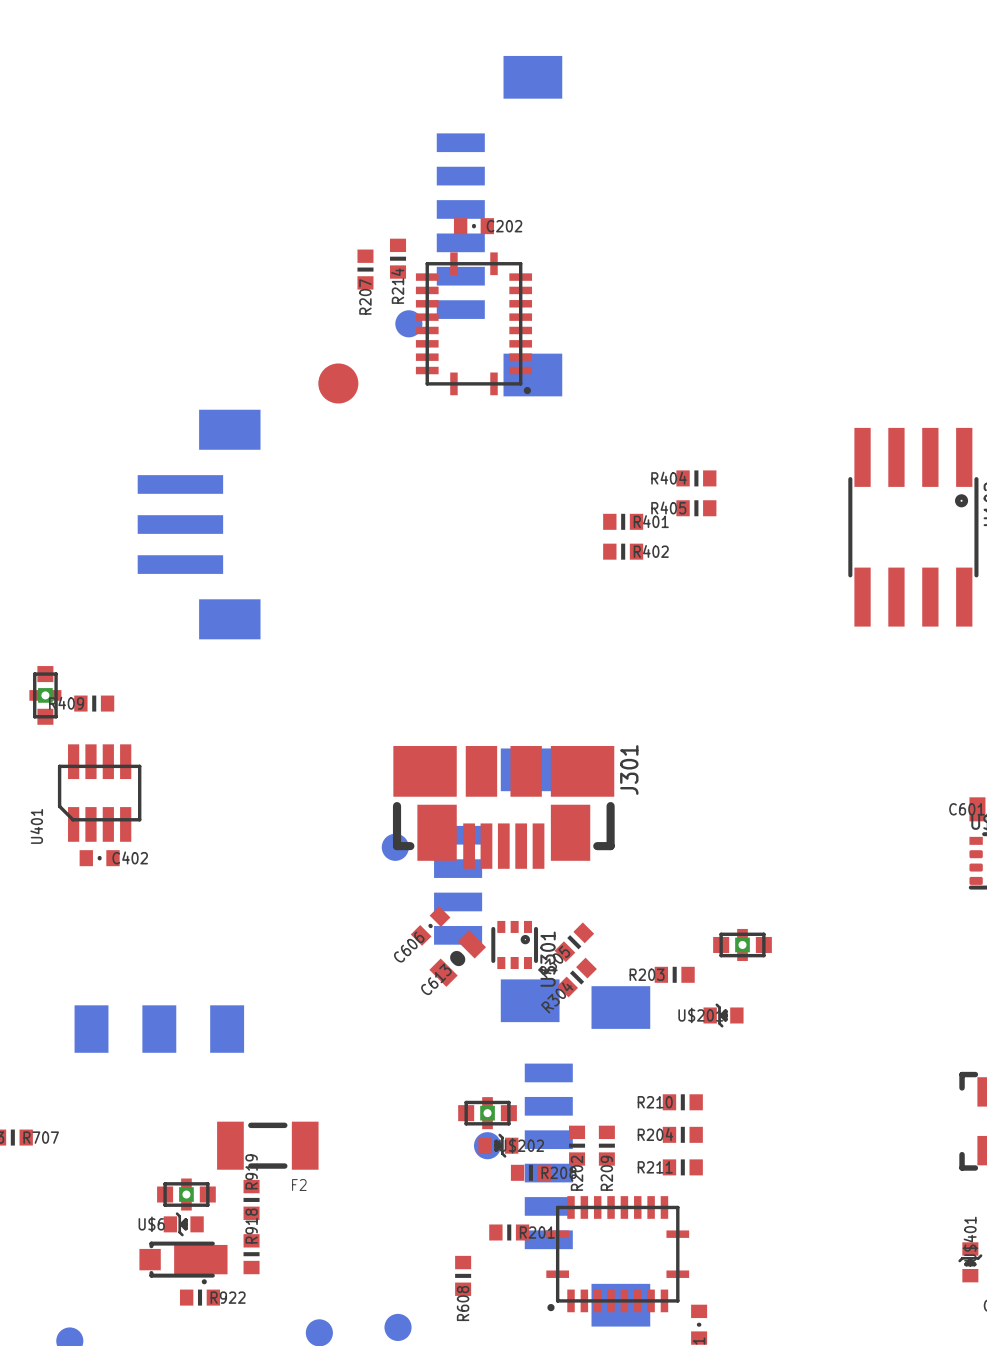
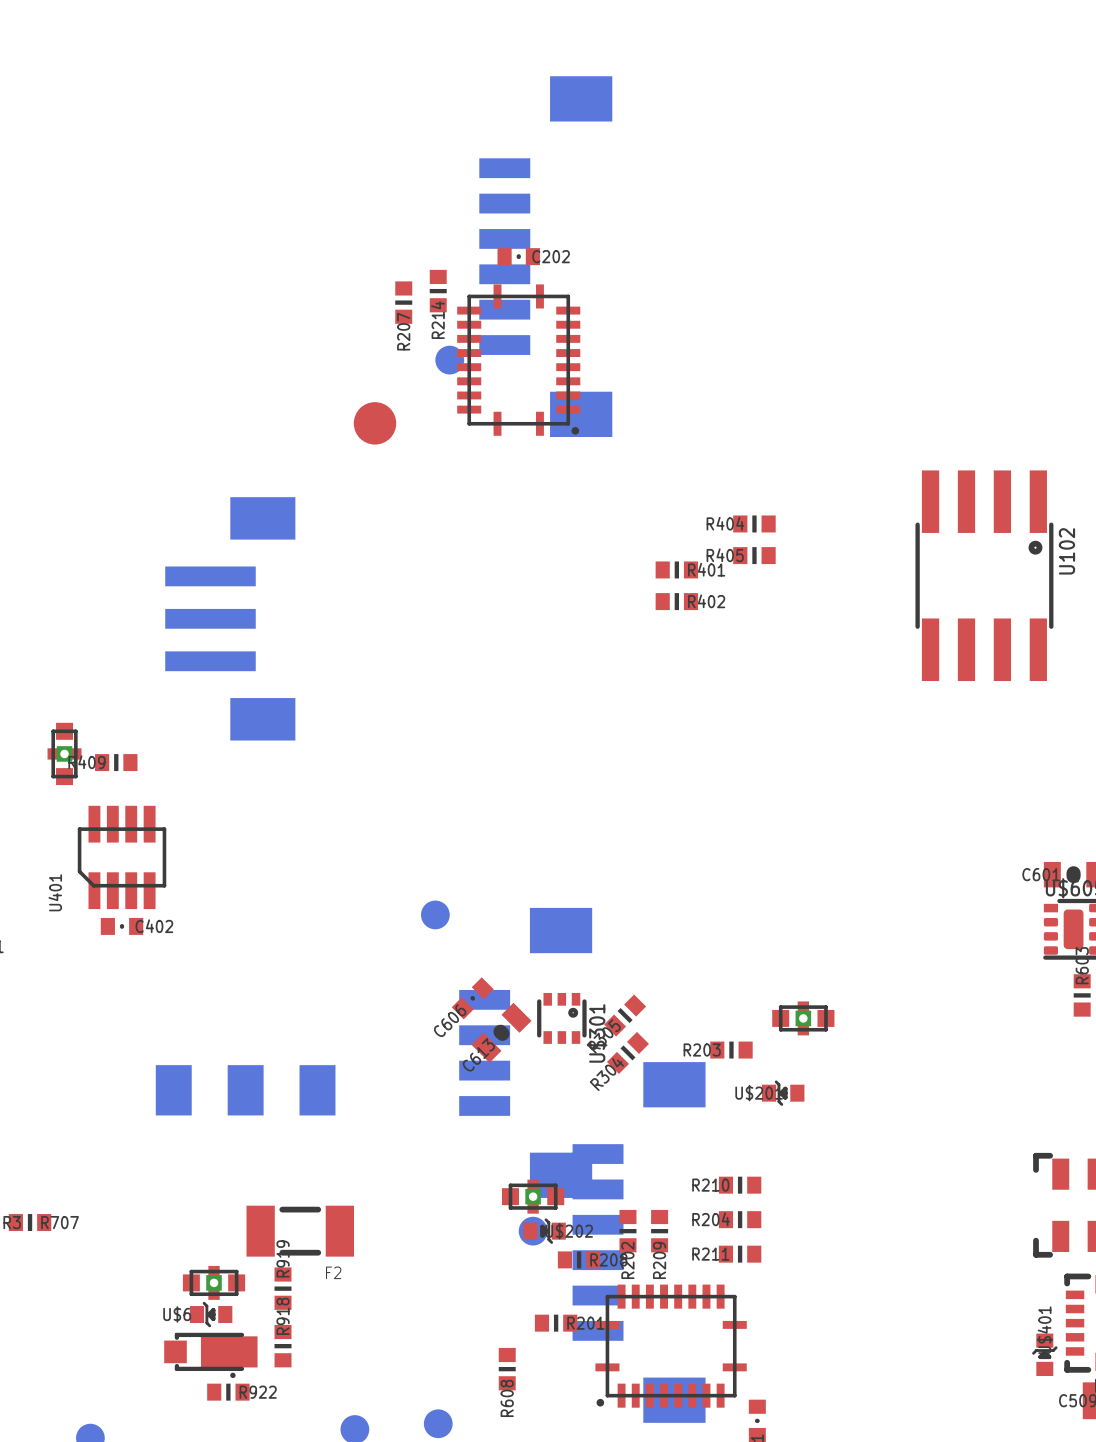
part position: (199, 524) -> (230, 618)
J301: (503, 807) -> none
part position: (496, 885) -> (525, 1052)
part position: (159, 1029) -> (245, 1090)

